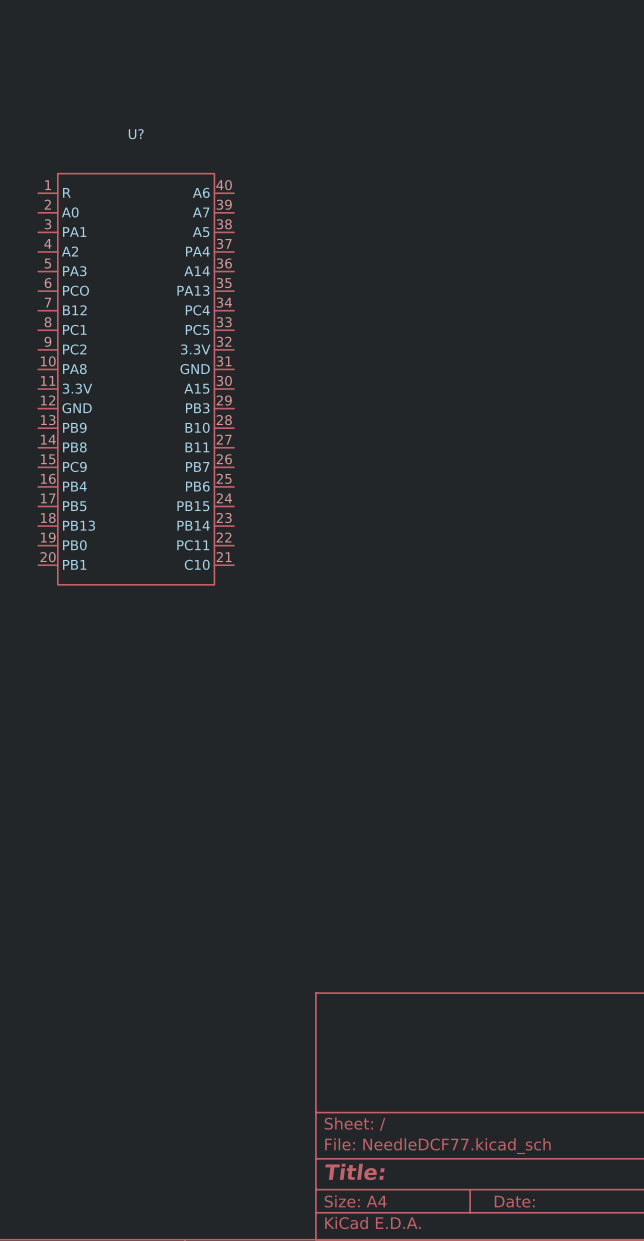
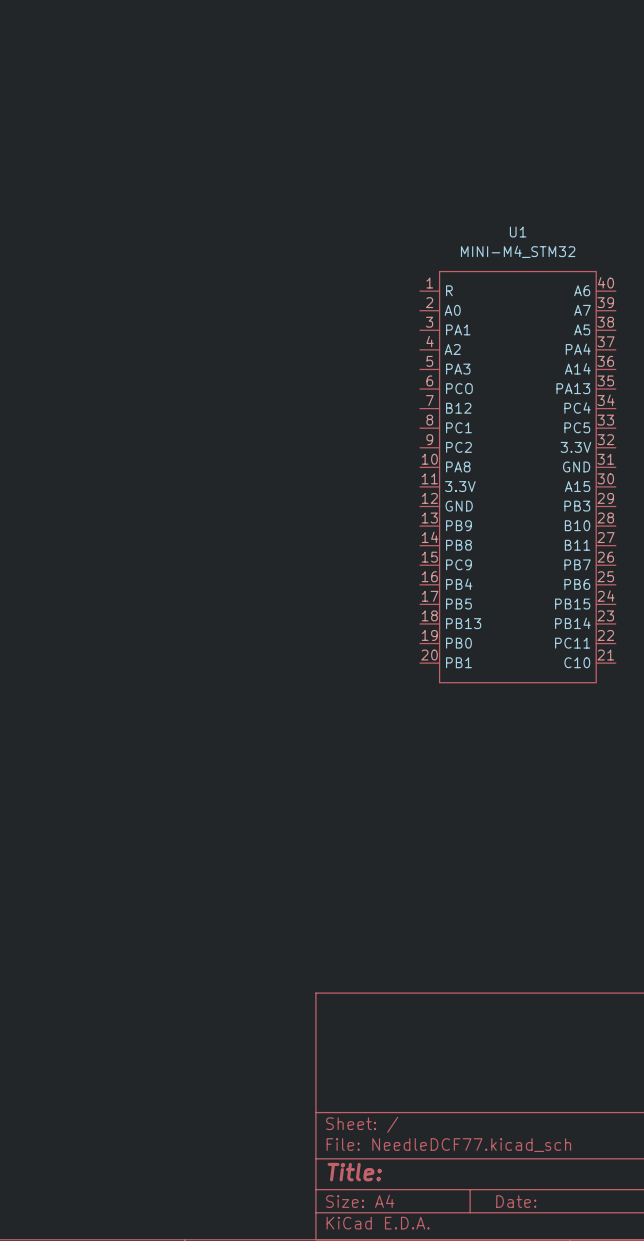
U?: (136, 379) -> none
U1: none -> MINI-M4_STM32 (517, 477)

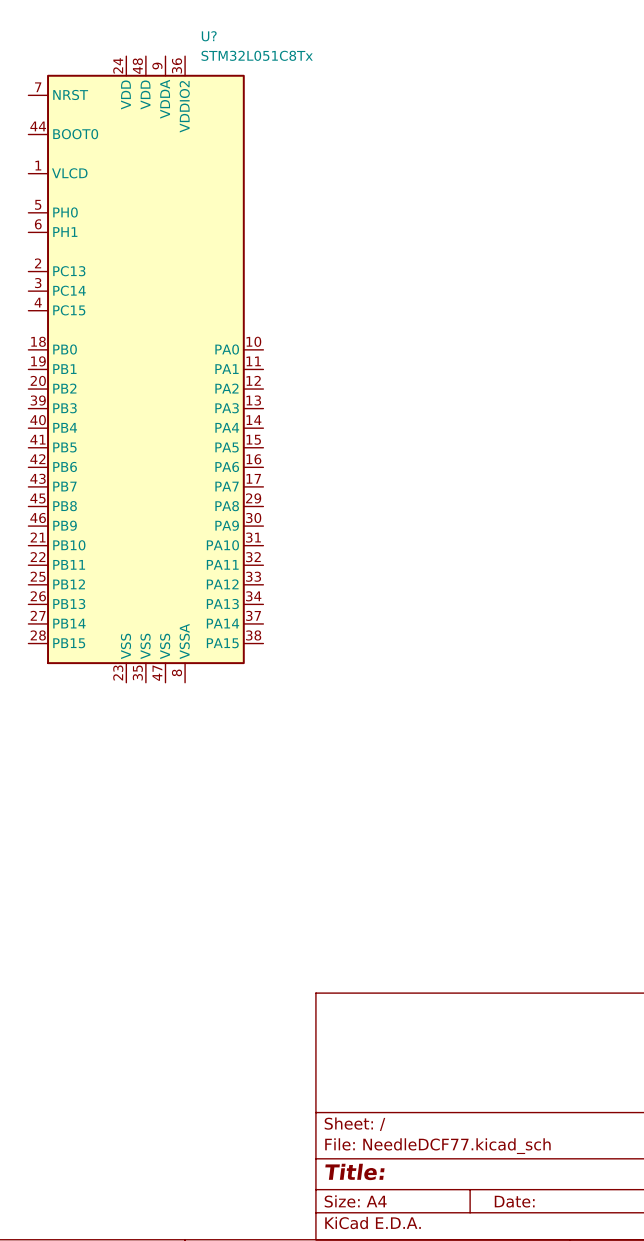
U?: none -> STM32L051C8Tx (145, 369)
U1: MINI-M4_STM32 (517, 477) -> none

